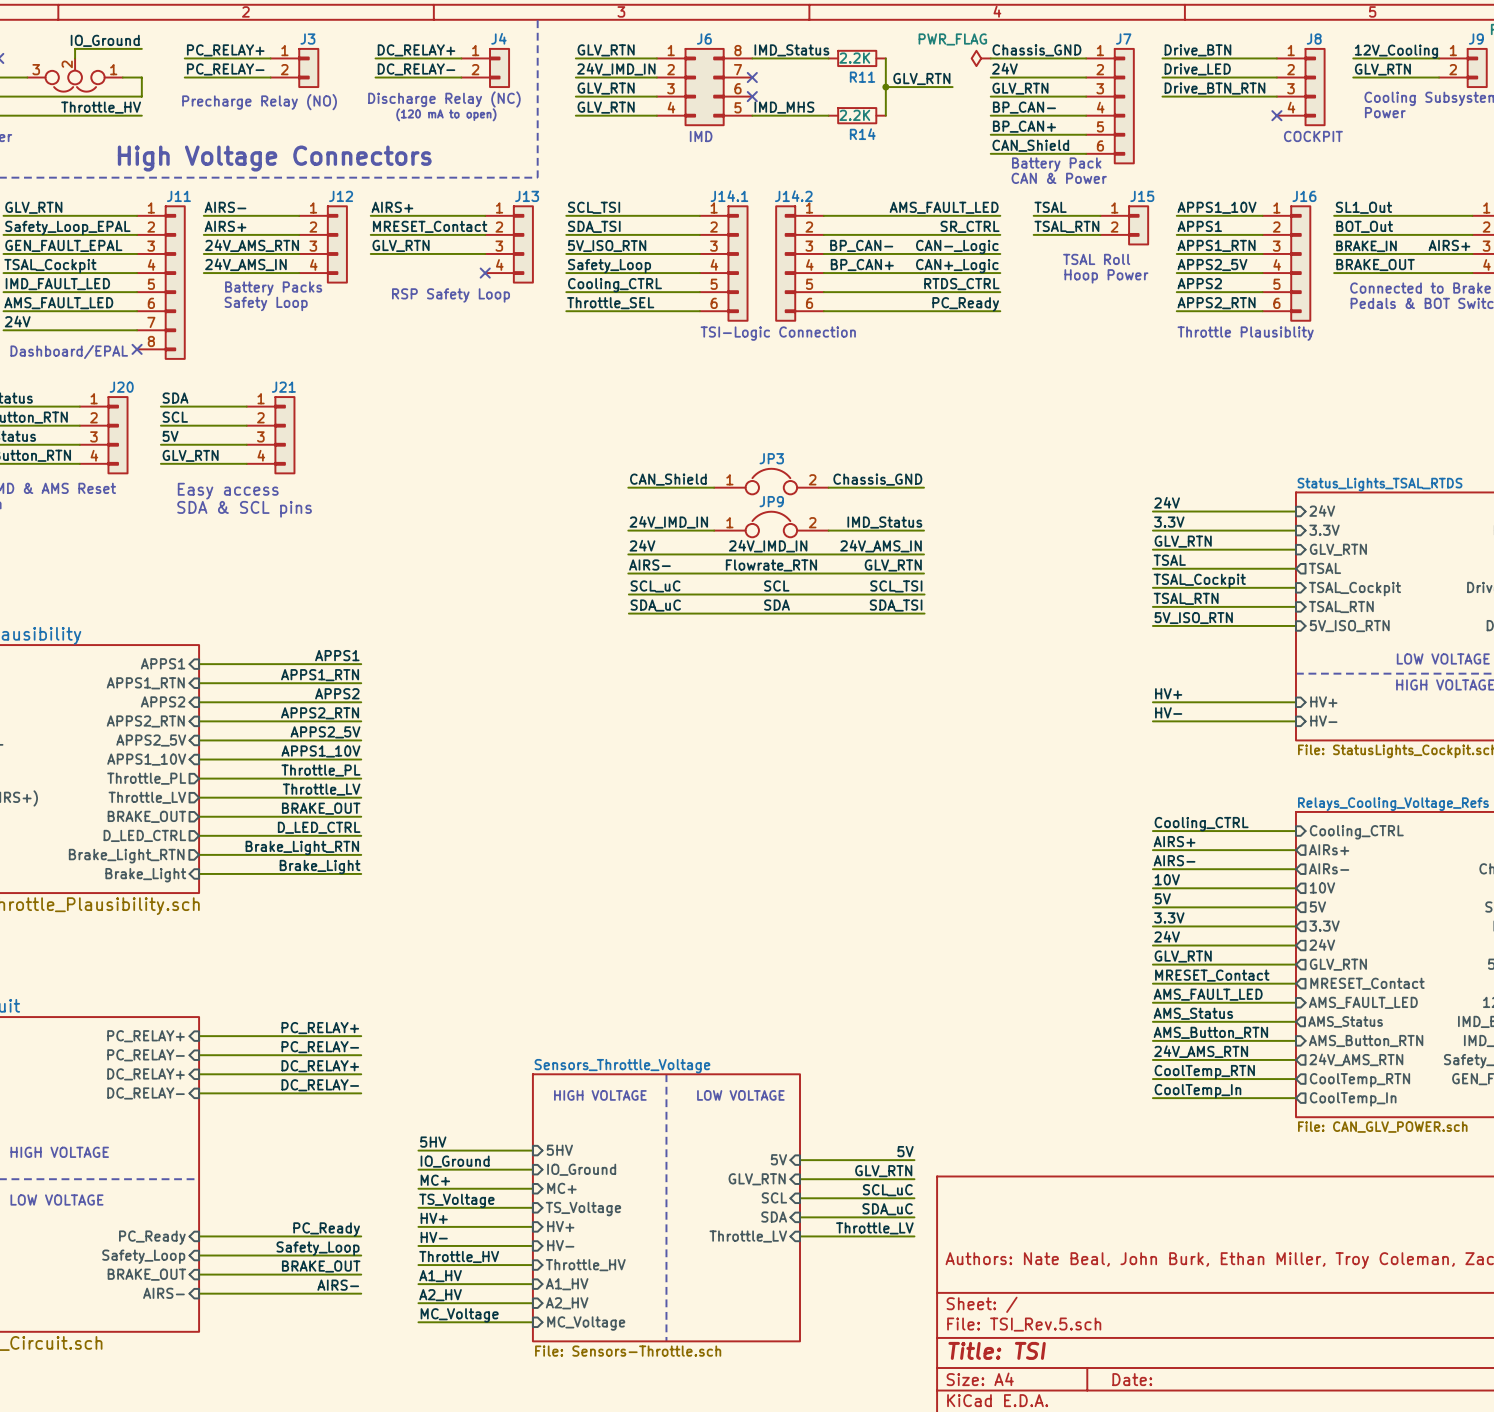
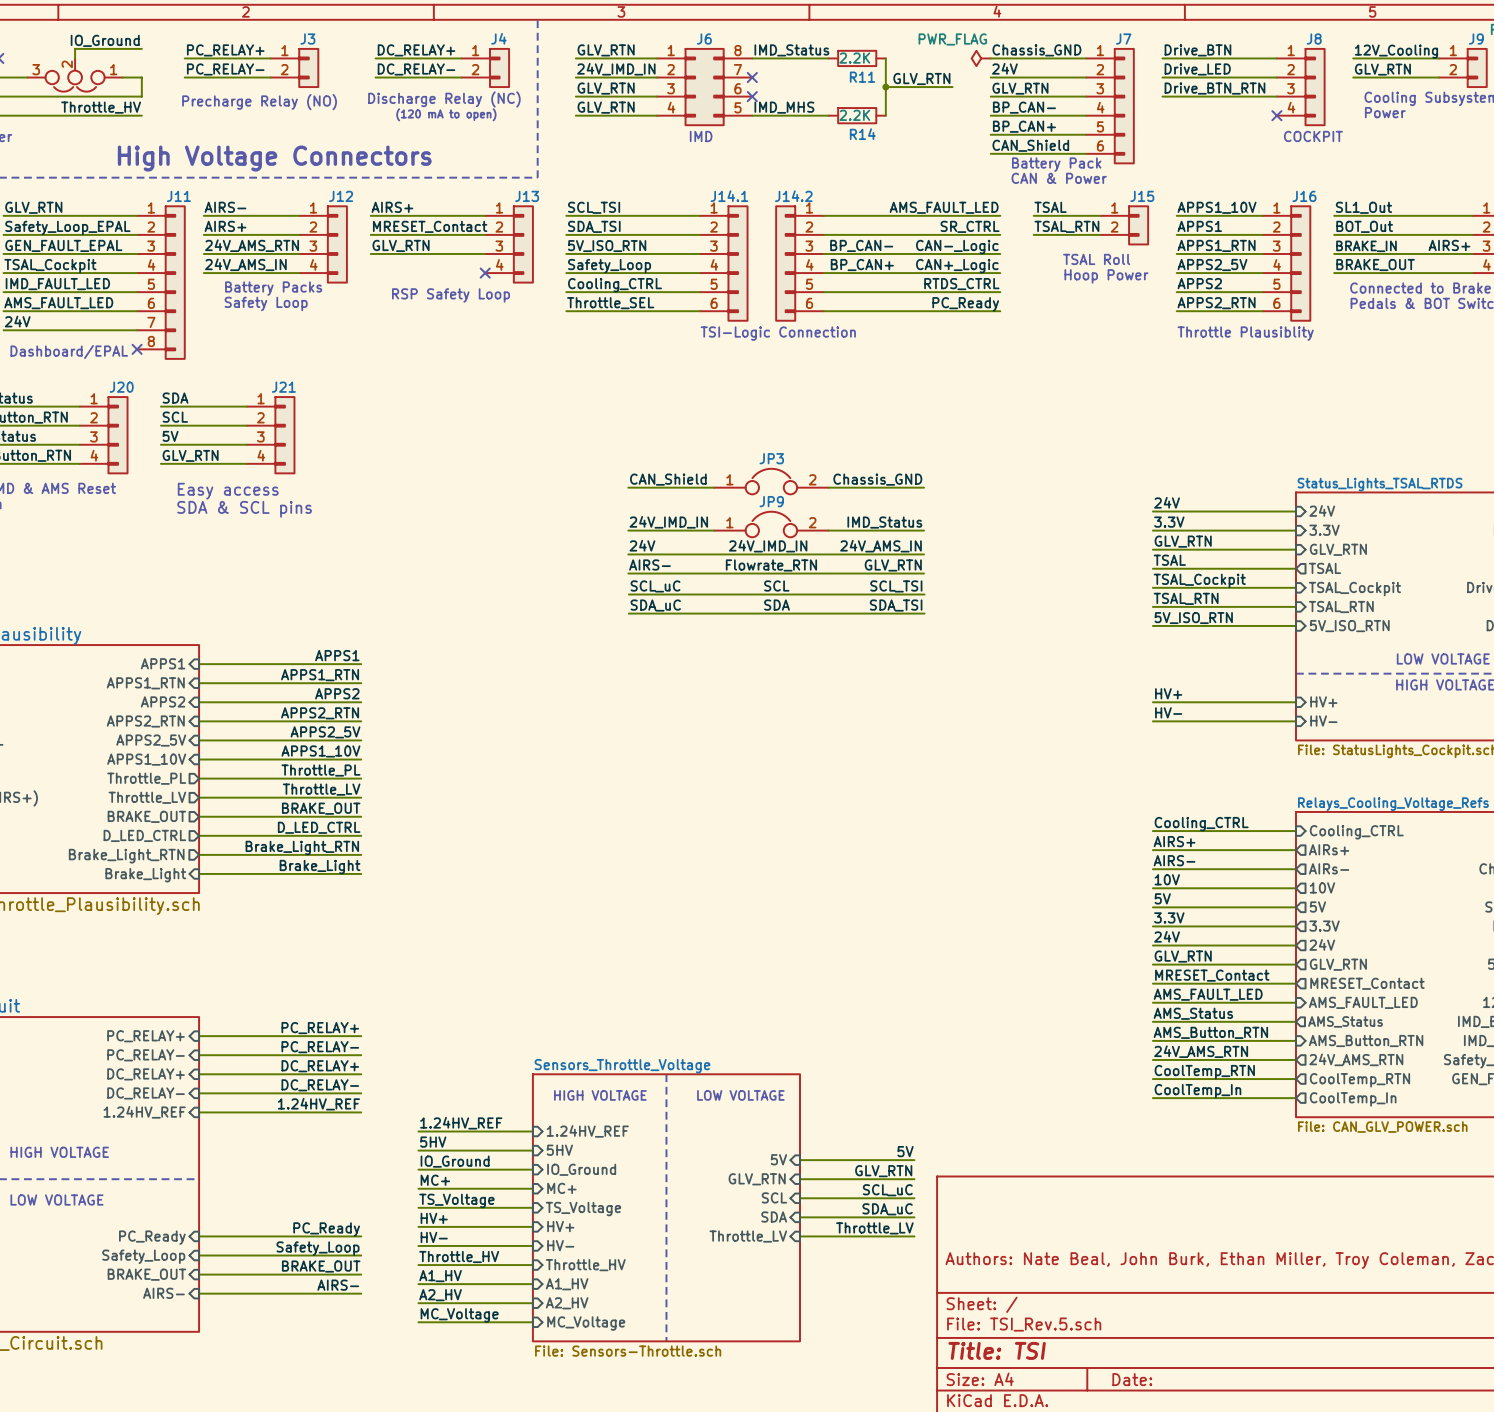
label: none -> 1.24HV_REF (318, 1104)
sheet pin: none -> 1.24HV_REF (144, 1112)
wire: none -> (199, 1112) (361, 1112)
label: none -> 1.24HV_REF (461, 1123)
wire: none -> (418, 1131) (532, 1131)
sheet pin: none -> 1.24HV_REF (587, 1131)

